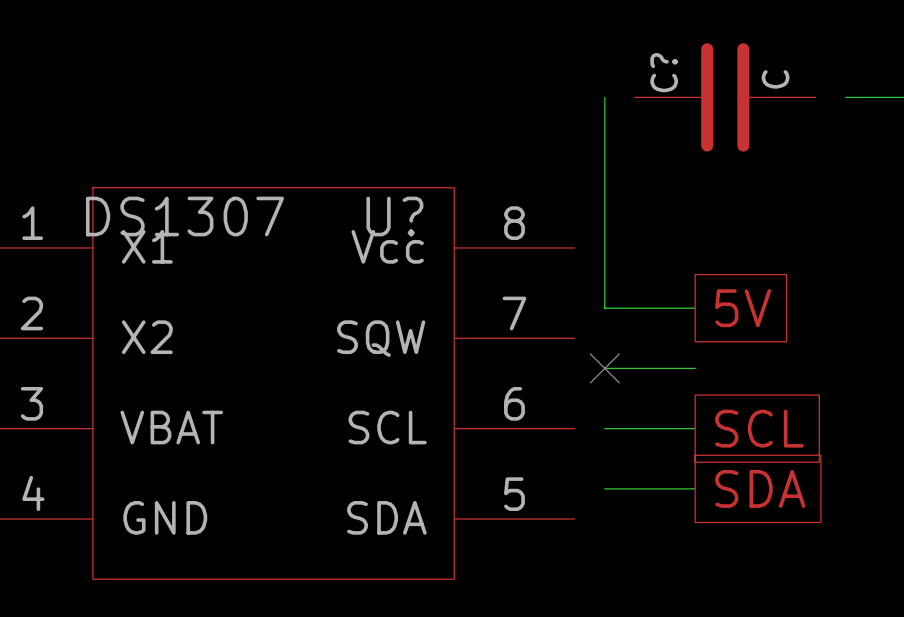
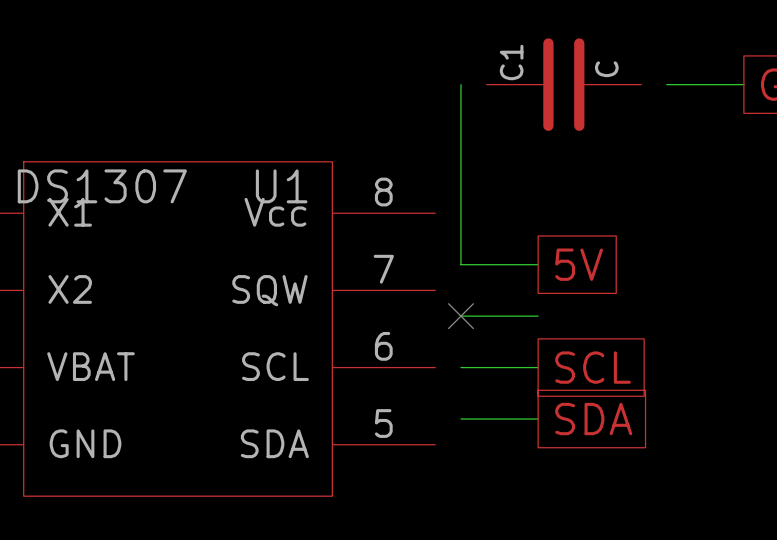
C? name: C? (664, 72) -> C1 (511, 62)
U? name: U? (394, 216) -> U1 (281, 186)

